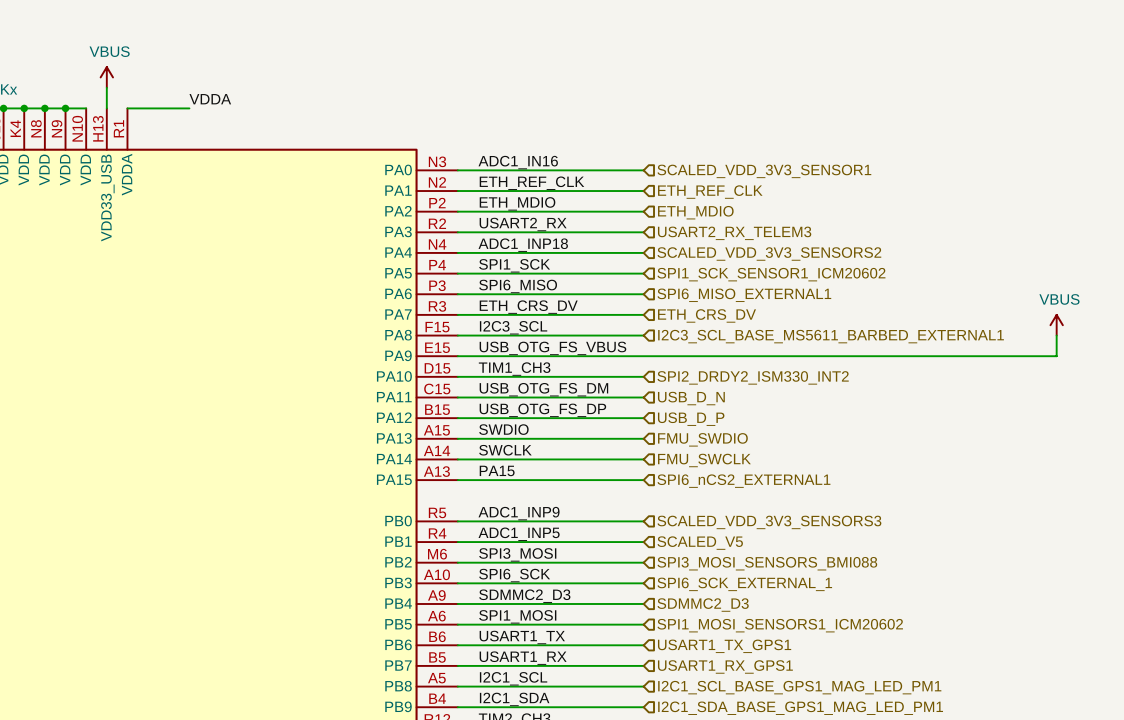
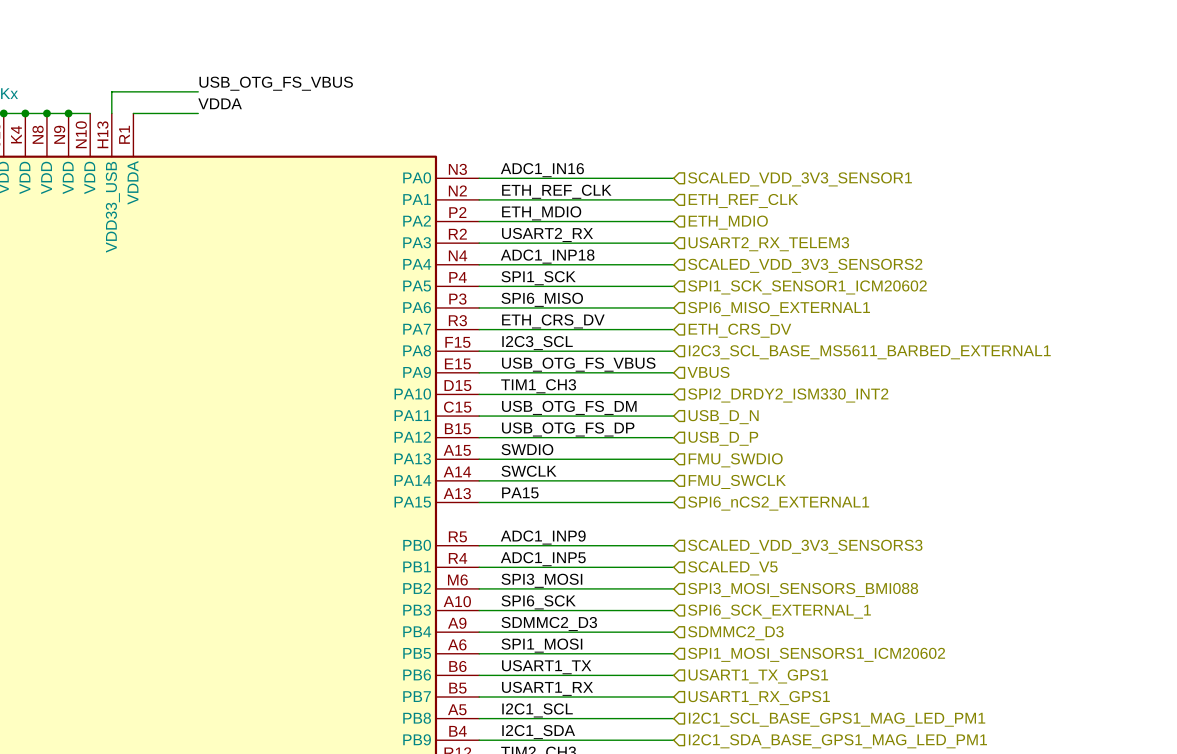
power symbol: VBUS (106, 77) -> none
label: none -> USB_OTG_FS_VBUS (276, 83)
wire: none -> (111, 91) (198, 91)
power symbol: VBUS (1056, 325) -> none
wire: (1056, 335) (1056, 356) (643, 356) -> none
hierarchical label: none -> VBUS (708, 372)

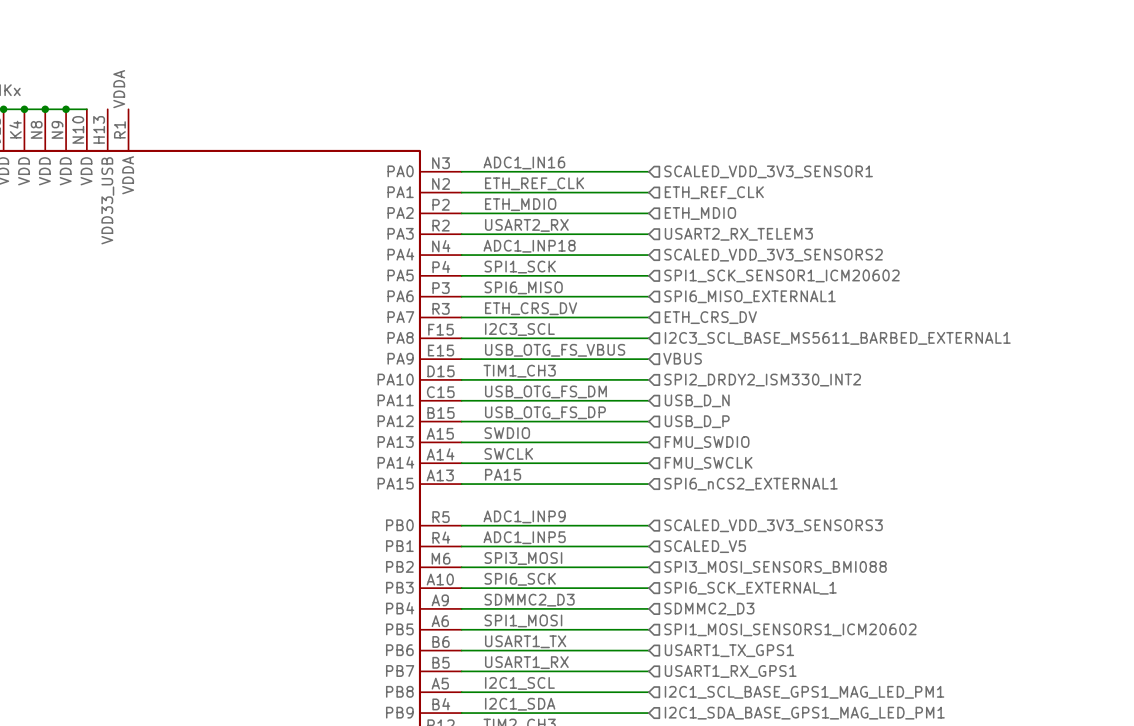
label: USB_OTG_FS_VBUS (276, 83) -> none
wire: (198, 91) (111, 91) (111, 113) -> none
label rotation: 0° (220, 103) -> 90° counterclockwise (119, 89)
label position: VDDA (220, 103) -> VDDA (119, 89)
wire: (133, 113) (198, 113) -> none

